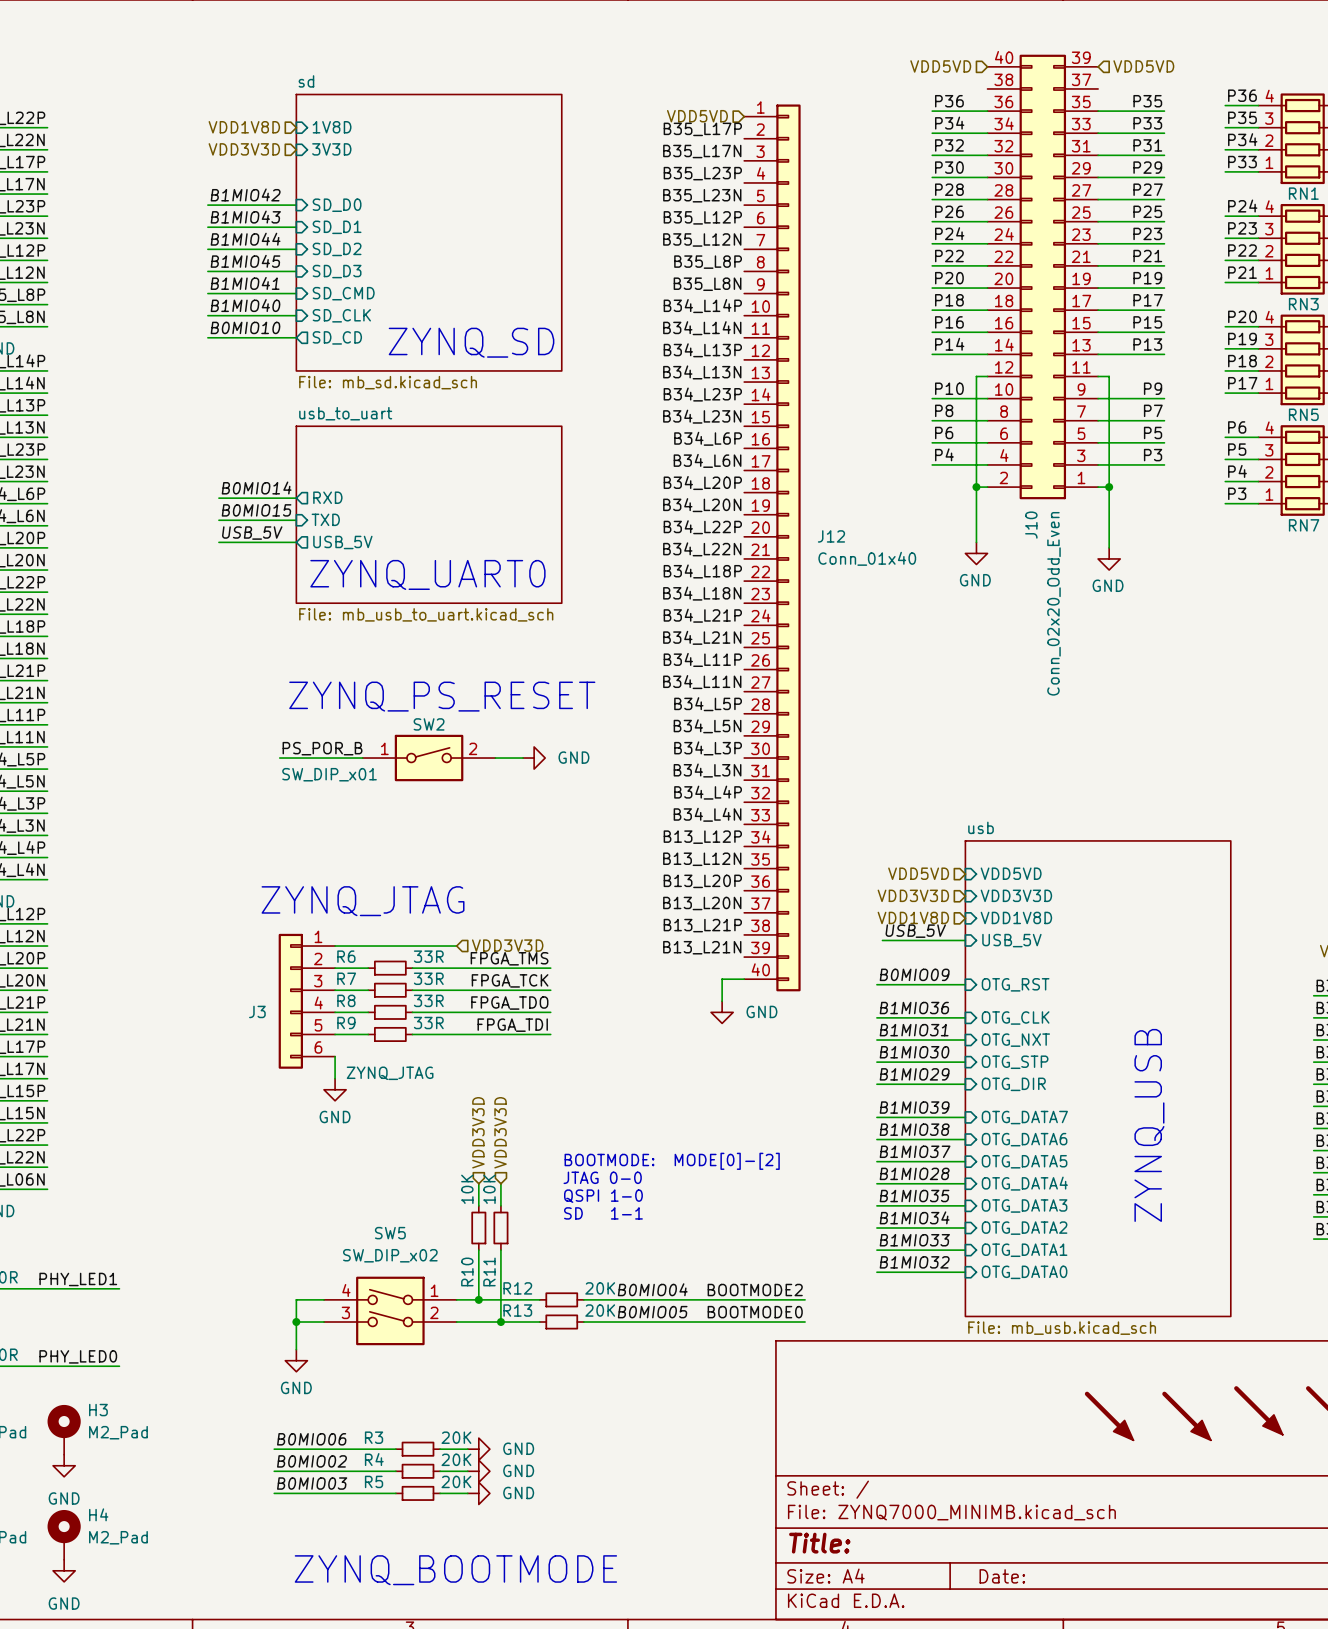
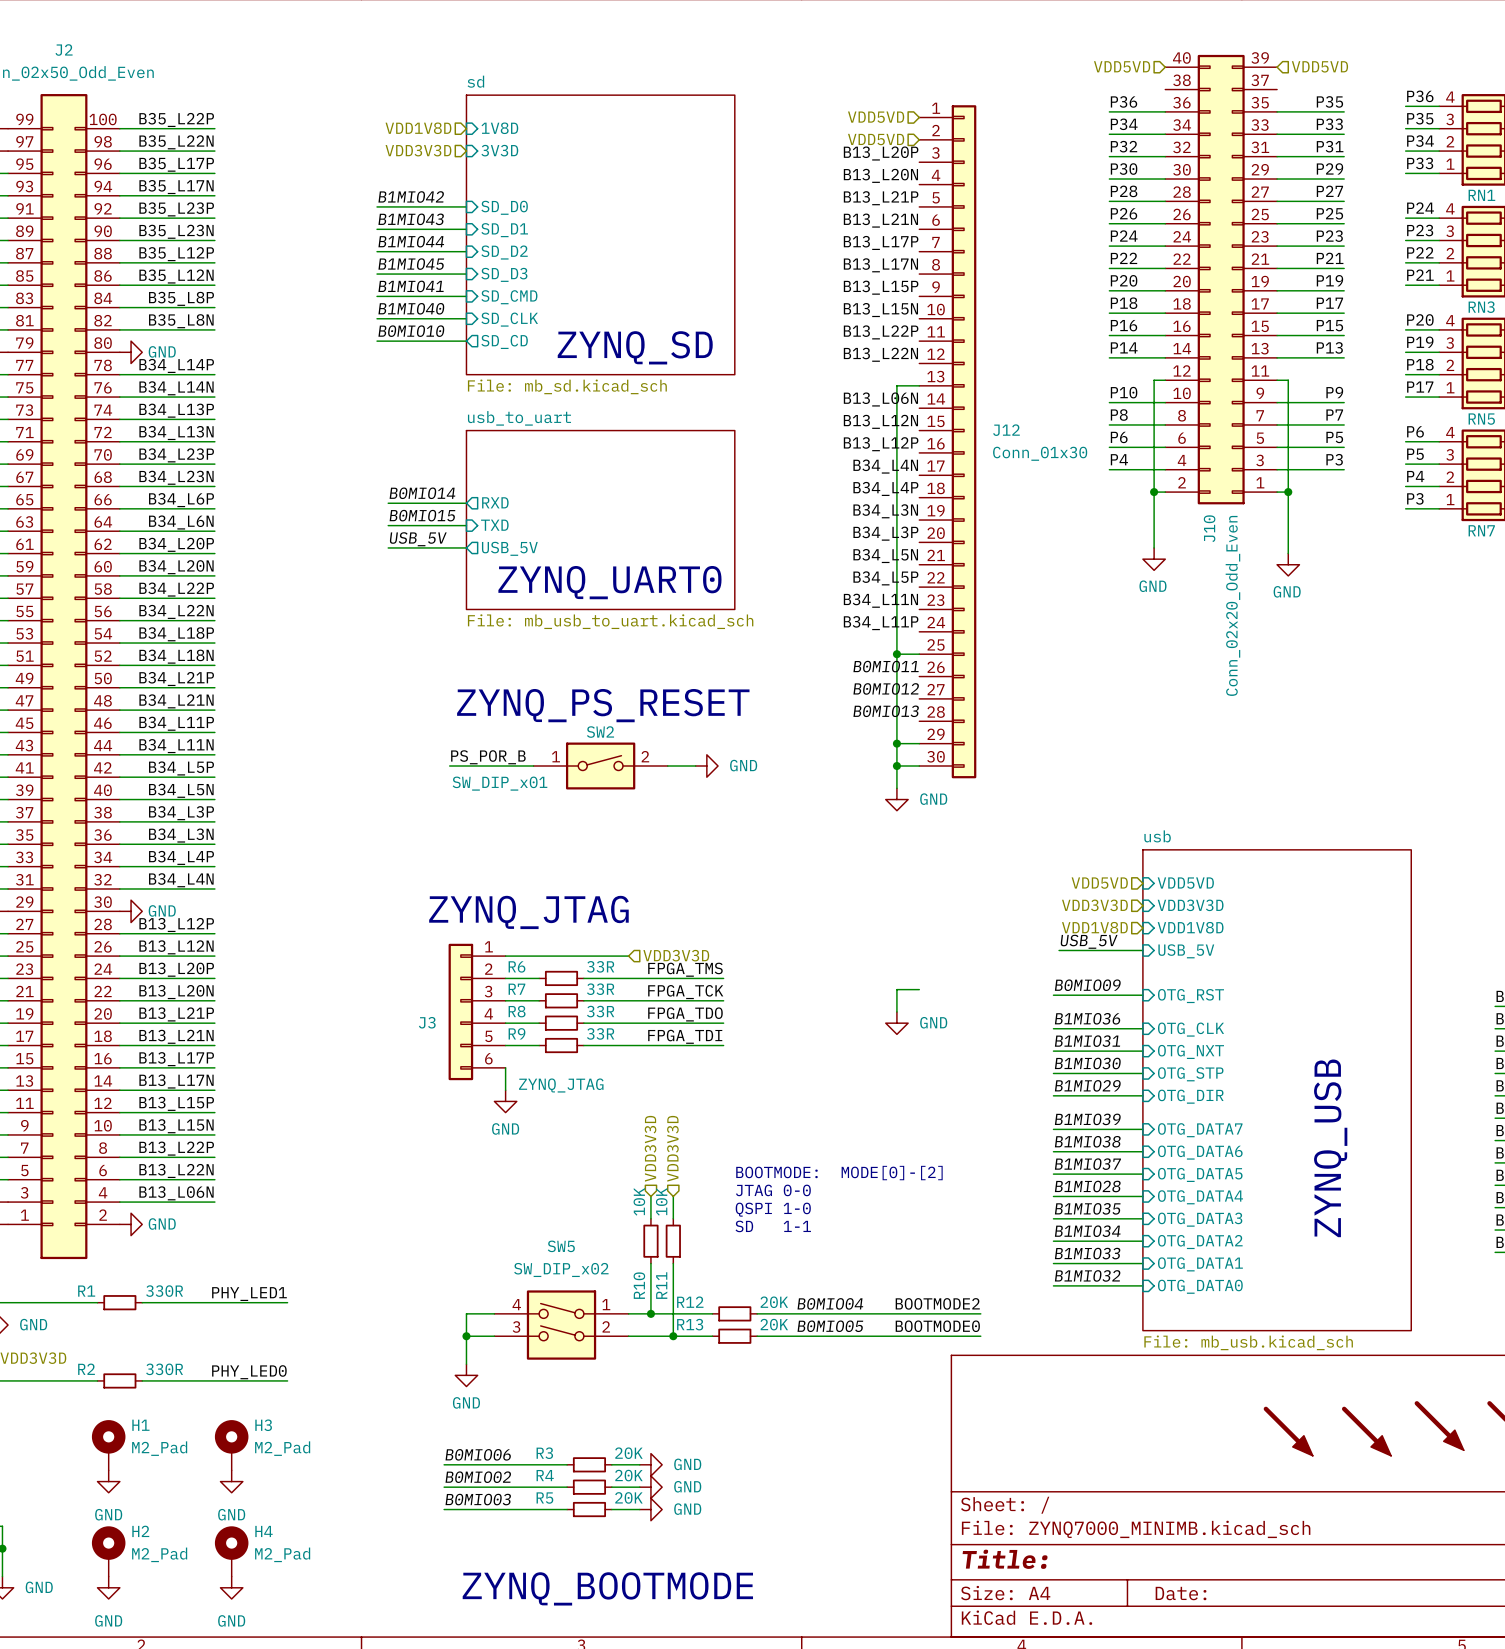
J12 symbol: [744, 104, 801, 992] -> [919, 105, 977, 779]
label: B35_L17P (702, 129) -> none
hierarchical label: none -> VDD5VD (876, 139)
label: B35_L17N (702, 151) -> B13_L20P (881, 153)
label: B35_L23P (702, 173) -> B13_L20N (880, 175)
label: B35_L23N (702, 195) -> B13_L21P (881, 198)
label: B35_L12P (702, 217) -> B13_L21N (880, 220)
label: B35_L12N (702, 239) -> B13_L17P (881, 242)
label: B35_L8P (708, 262) -> B13_L17N (880, 265)
label: B35_L8N (707, 284) -> B13_L15P (881, 287)
label: B34_L14P (702, 306) -> B13_L15N (880, 310)
label: B34_L14N (702, 328) -> B13_L22P (881, 332)
label: B34_L13P (702, 350) -> B13_L22N (880, 354)
label: B34_L13N (702, 372) -> none
wire: none -> (919, 385) (896, 385) (896, 788)
label: B34_L23P (702, 394) -> B13_L06N (880, 399)
label: B34_L23N (702, 416) -> B13_L12N (880, 421)
label: B34_L6P (708, 438) -> B13_L12P (881, 444)
label: B34_L6N (707, 460) -> B34_L4N (885, 466)
label: B34_L20P (702, 483) -> B34_L4P (885, 488)
label: B34_L20N (702, 505) -> B34_L3N (885, 511)
label: B34_L22P (702, 527) -> B34_L3P (885, 533)
label: B34_L22N (702, 549) -> B34_L5N (885, 556)
J12 value: Conn_01x40 (867, 558) -> Conn_01x30 (1040, 453)
label: B34_L18P (702, 571) -> B34_L5P (885, 578)
label: B34_L18N (702, 593) -> B34_L11N (880, 600)
label: B34_L21P (702, 615) -> B34_L11P (881, 623)
label: B34_L21N (702, 637) -> none
wire: none -> (896, 654) (919, 654)
junction: none -> (896, 654)
label: B34_L11P (702, 659) -> B0MIO11 (886, 666)
label: B34_L11N (702, 682) -> B0MIO12 (886, 688)
label: B34_L5P (708, 704) -> B0MIO13 (886, 711)
label: B34_L5N (707, 726) -> none
wire: none -> (896, 743) (919, 743)
junction: none -> (896, 743)
label: B34_L3P (708, 748) -> none
wire: none -> (896, 766) (919, 766)
junction: none -> (896, 766)
label: B34_L3N (707, 770) -> none
power symbol: none -> GND (896, 799)
label: B34_L4P (708, 792) -> none
label: B34_L4N (707, 814) -> none
label: B13_L12P (702, 837) -> none
label: B13_L12N (702, 859) -> none
label: B13_L20P (702, 881) -> none
label: B13_L20N (702, 903) -> none
label: B13_L21P (702, 925) -> none
label: B13_L21N (702, 947) -> none

